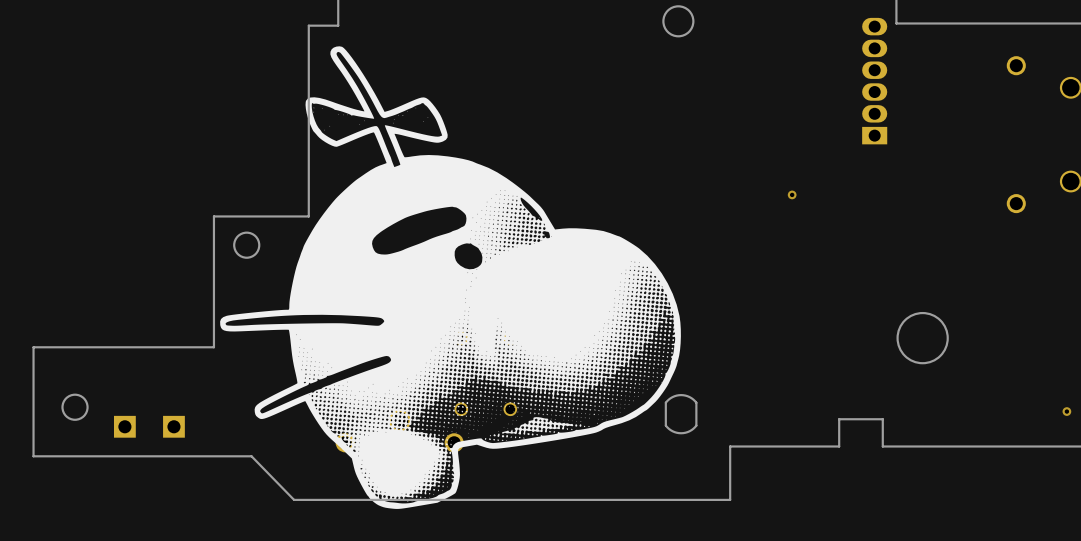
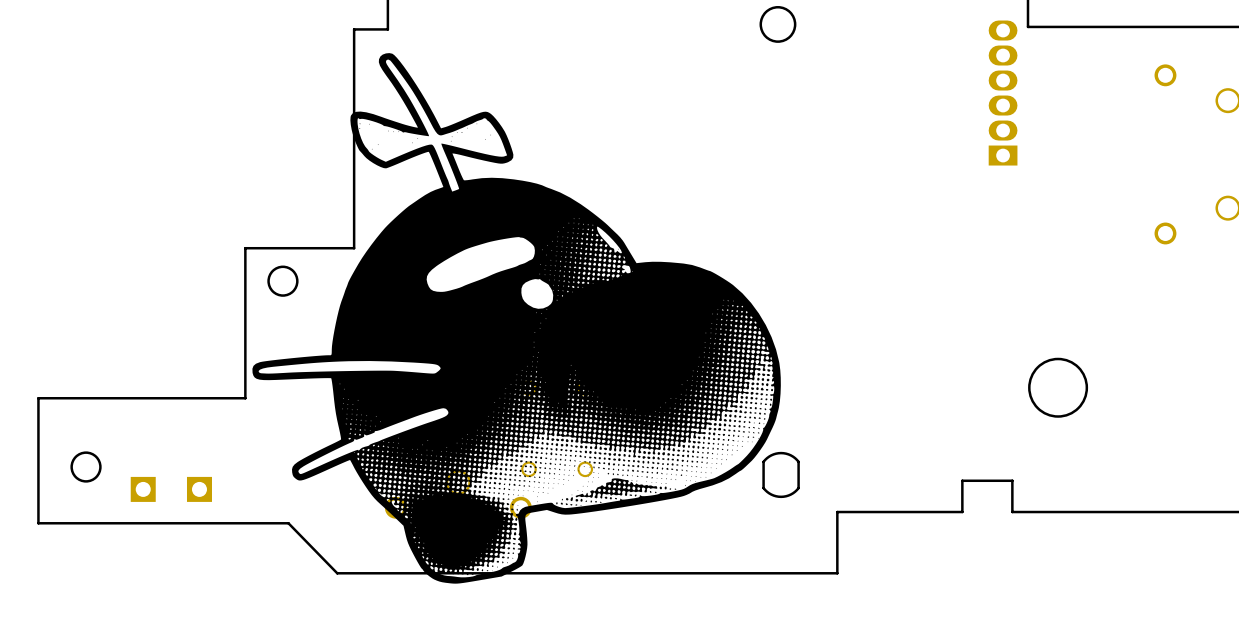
via: (792, 194) -> none
via: (1066, 411) -> none

